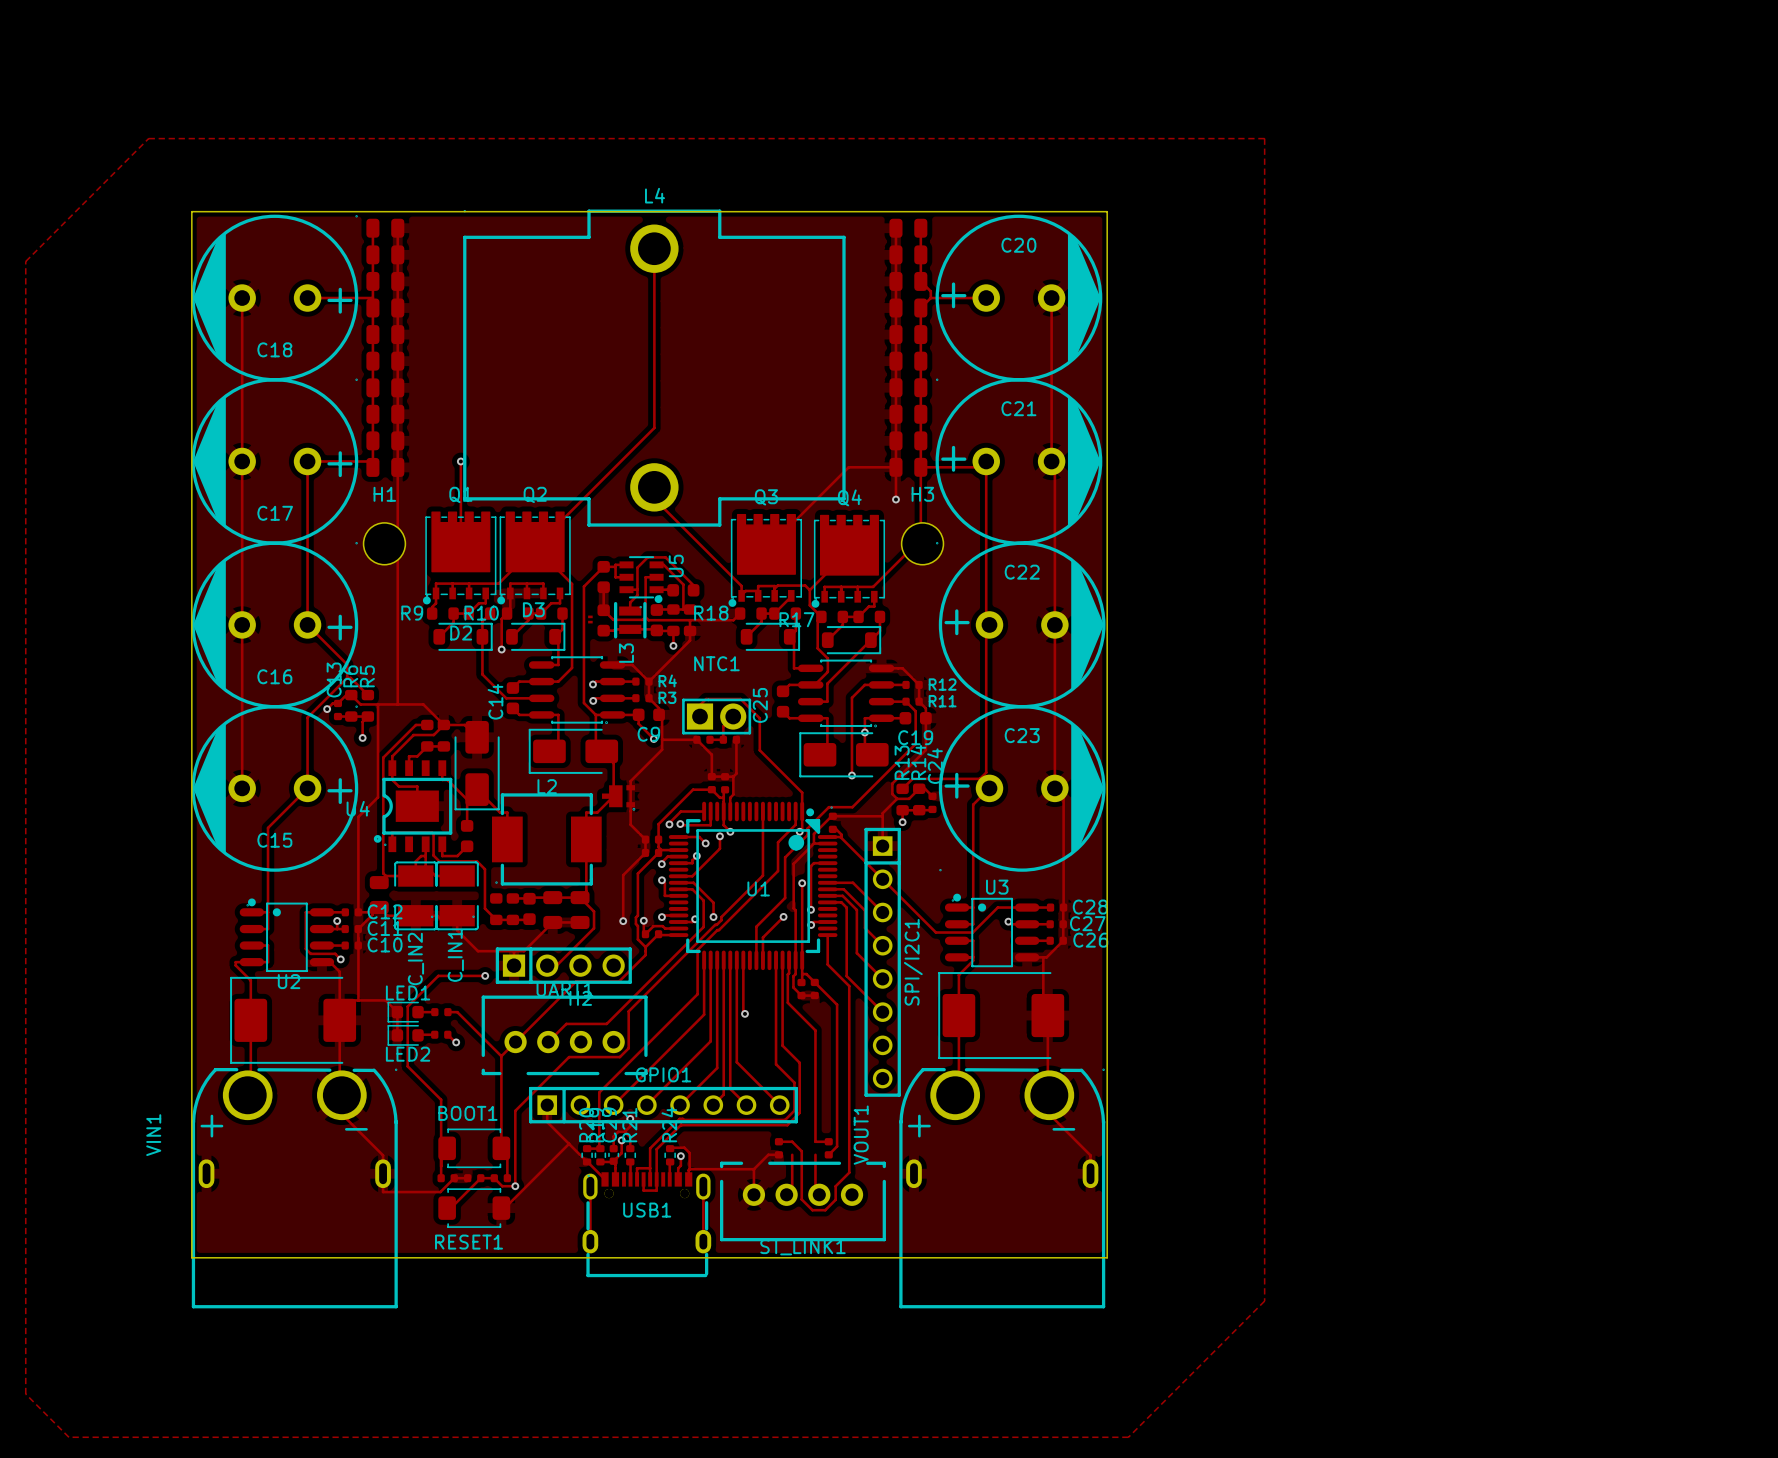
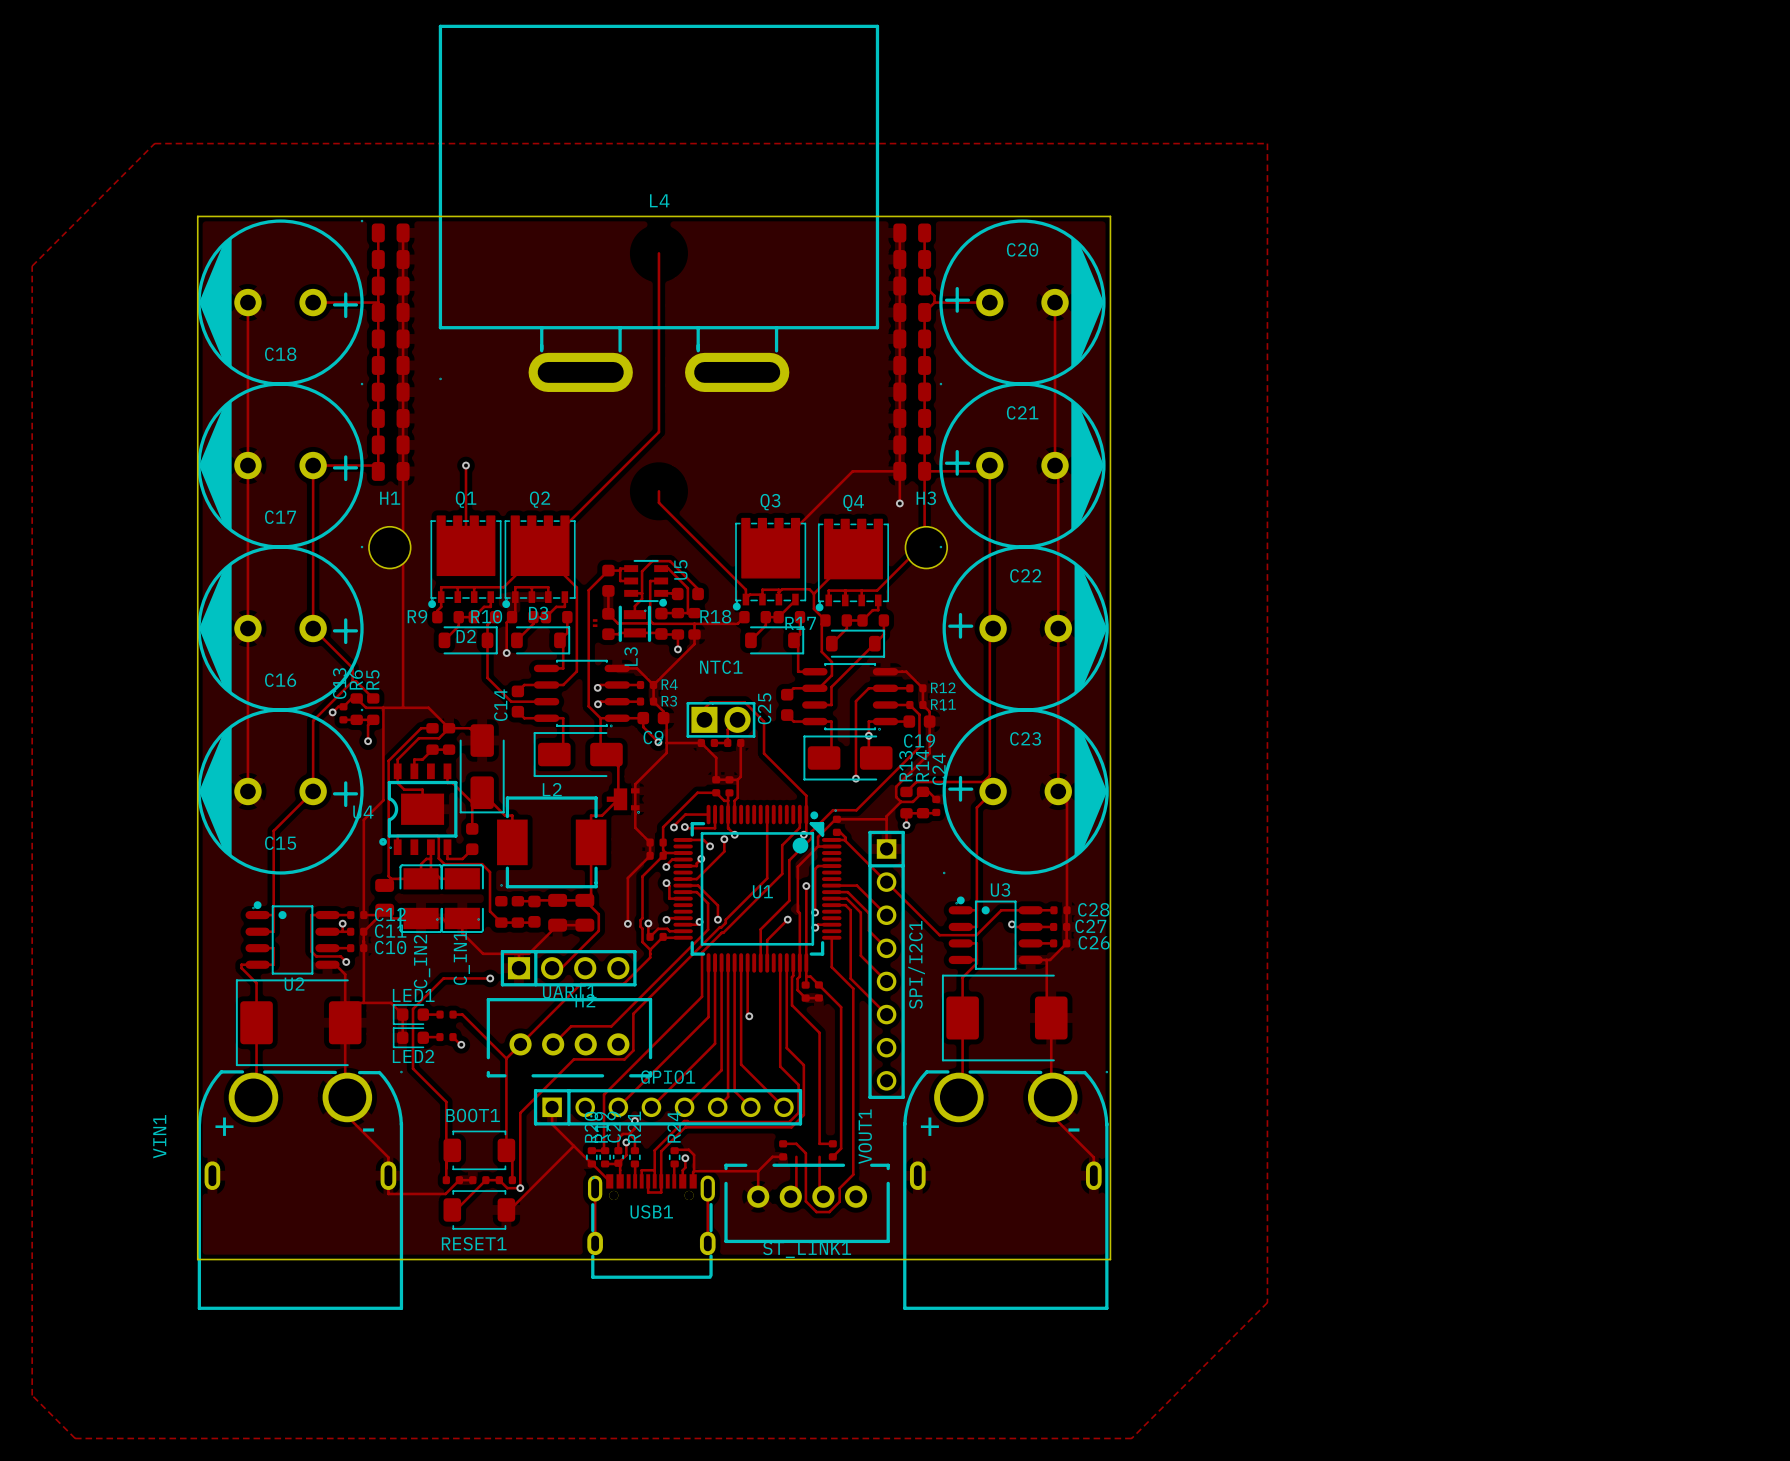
L4 footprint: [463, 209, 846, 527] -> [438, 24, 880, 392]

